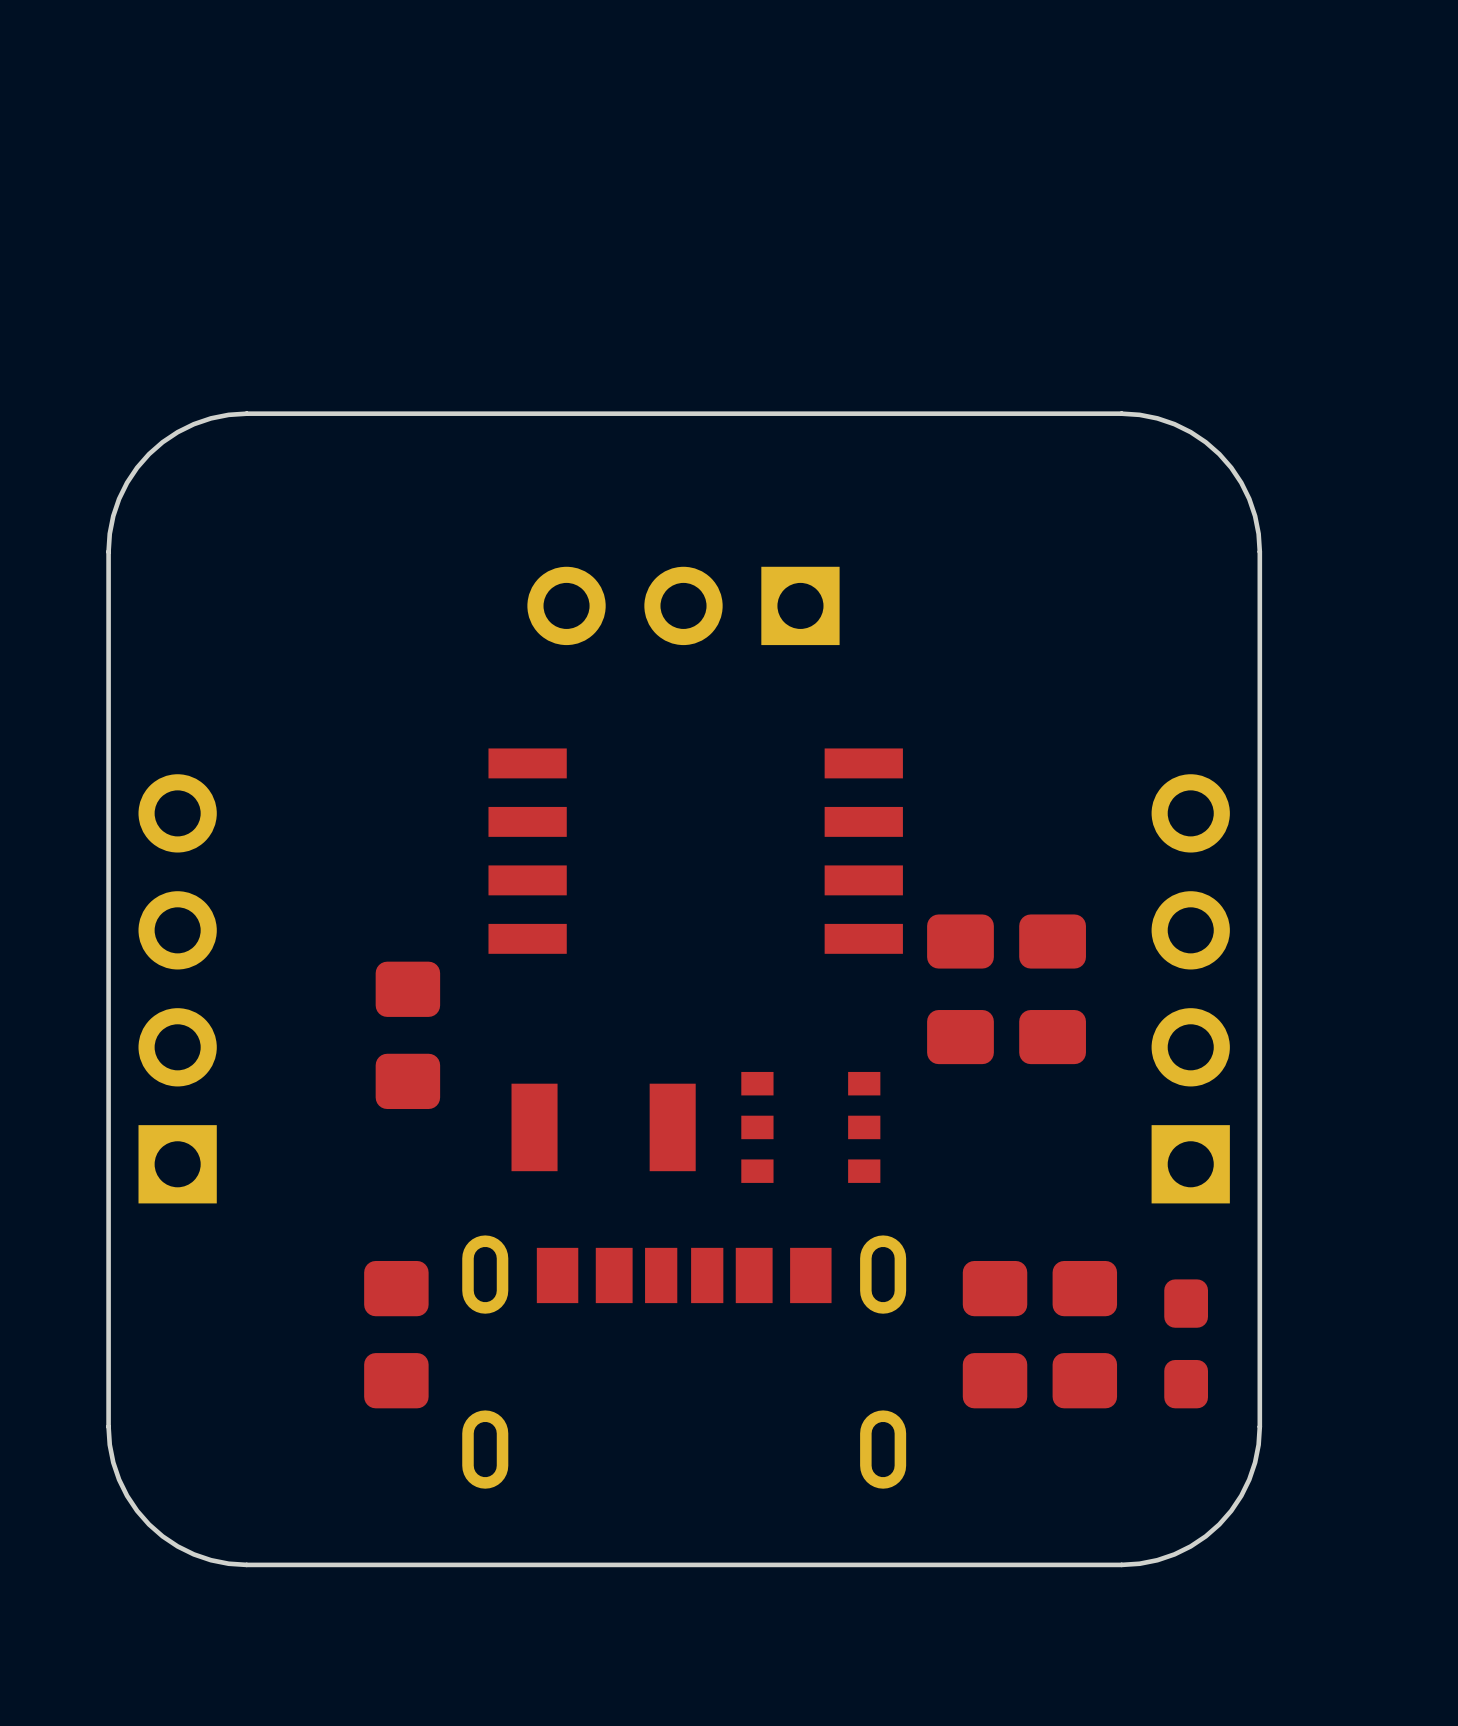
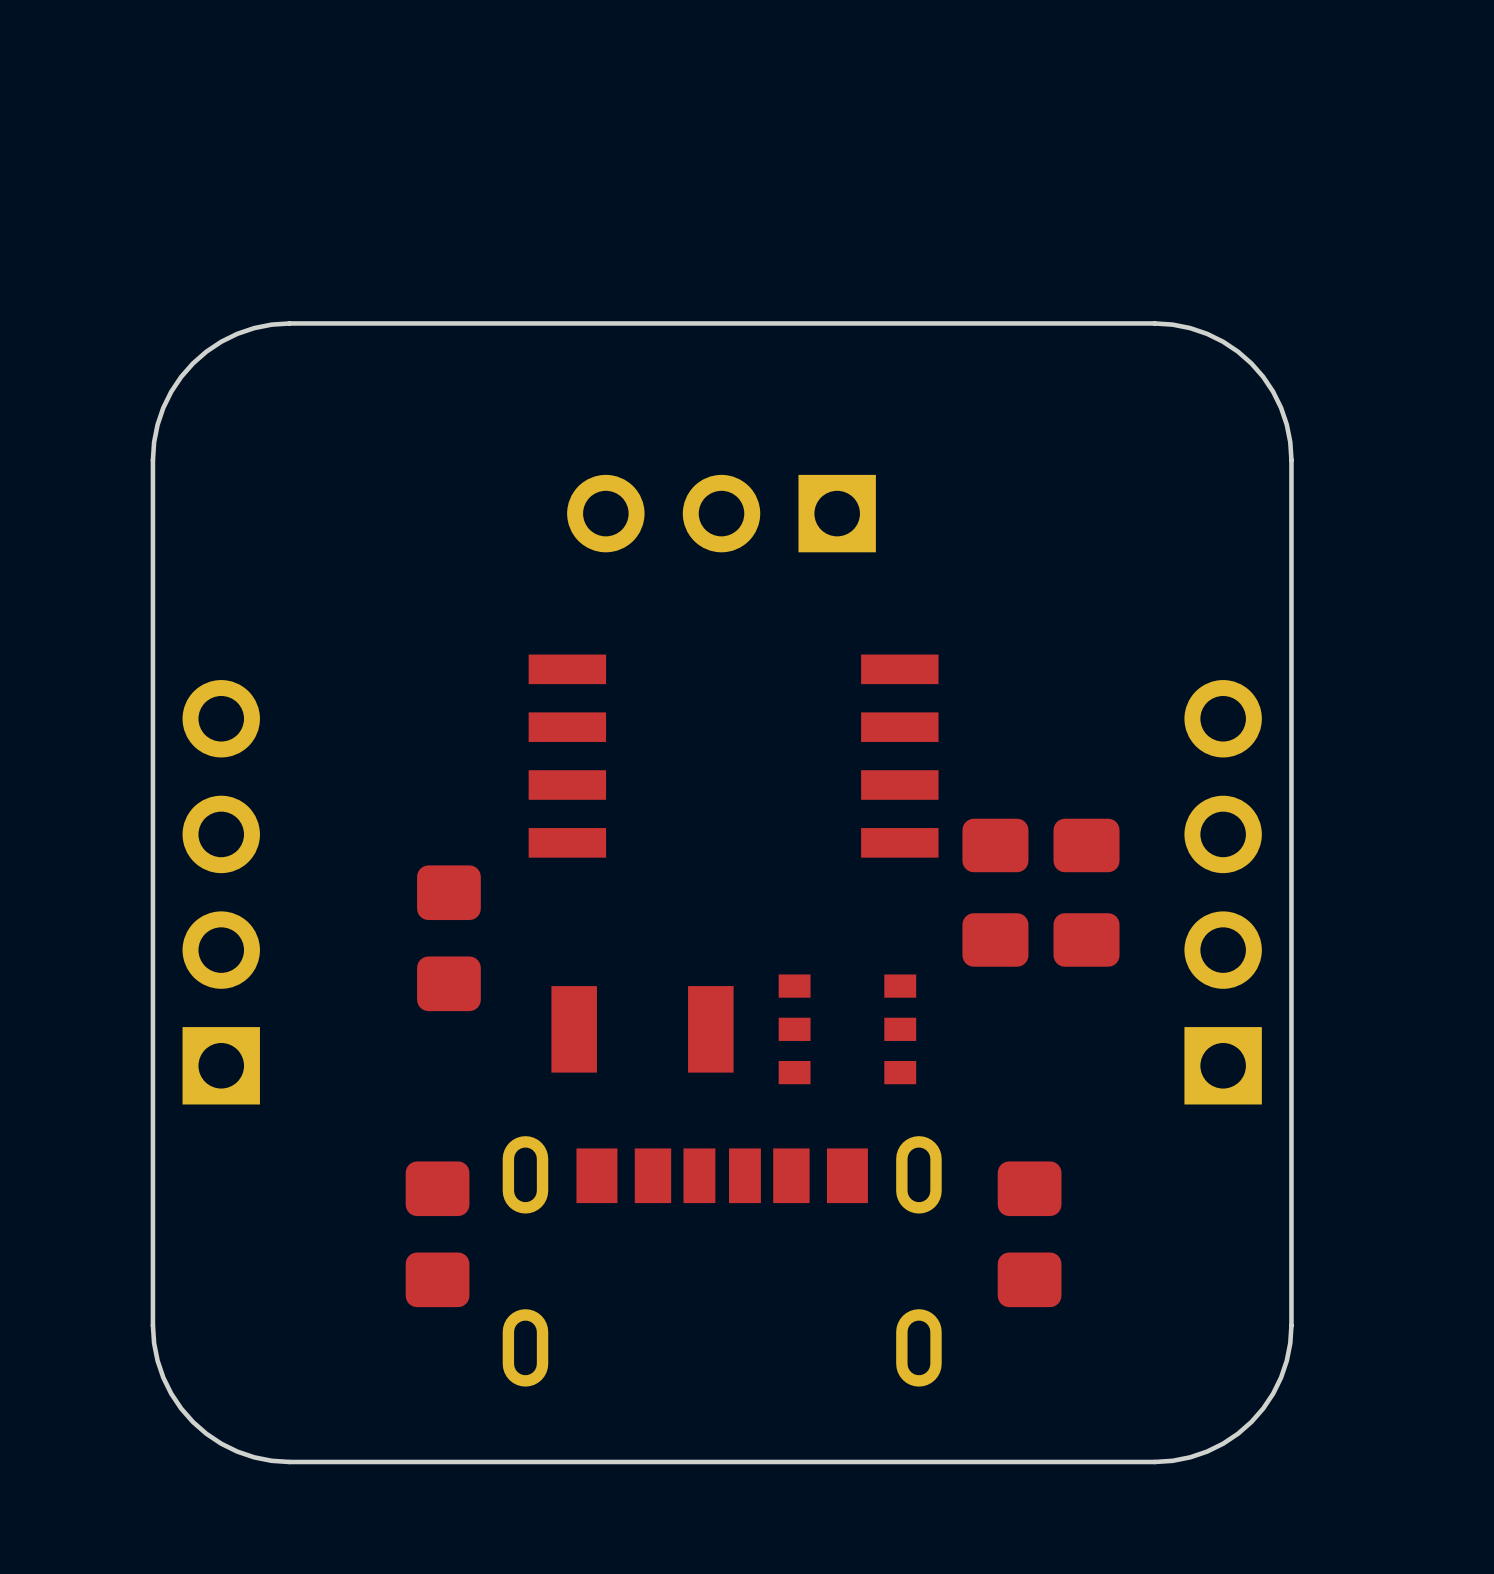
part: (1084, 1334) -> none
part: (1186, 1343) -> none

